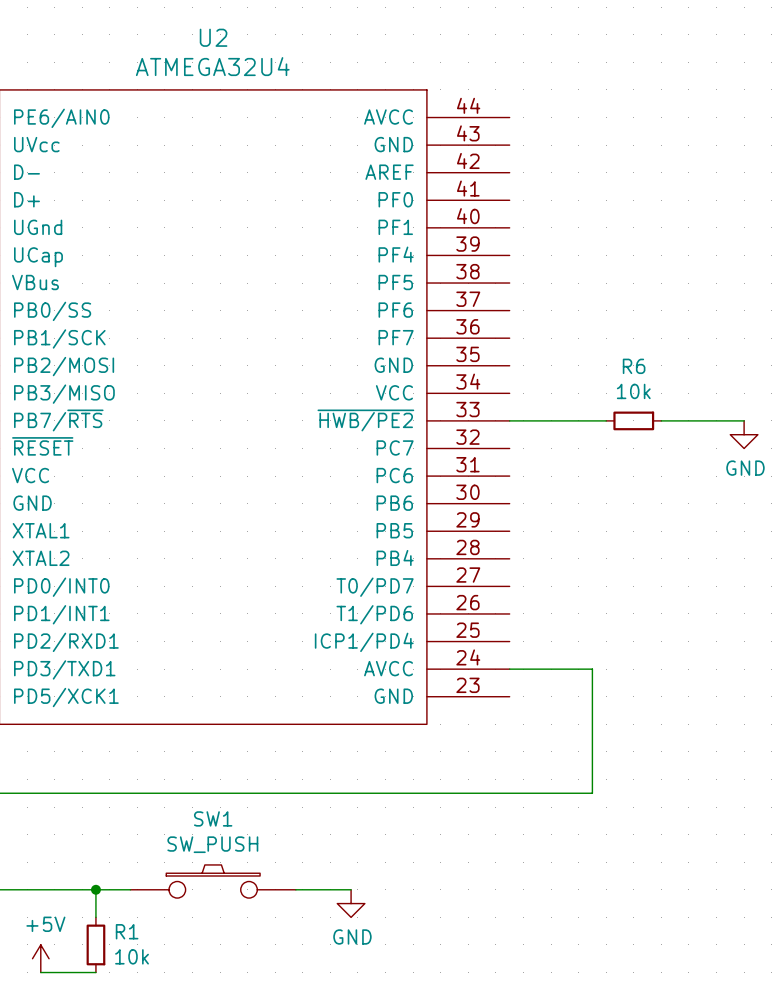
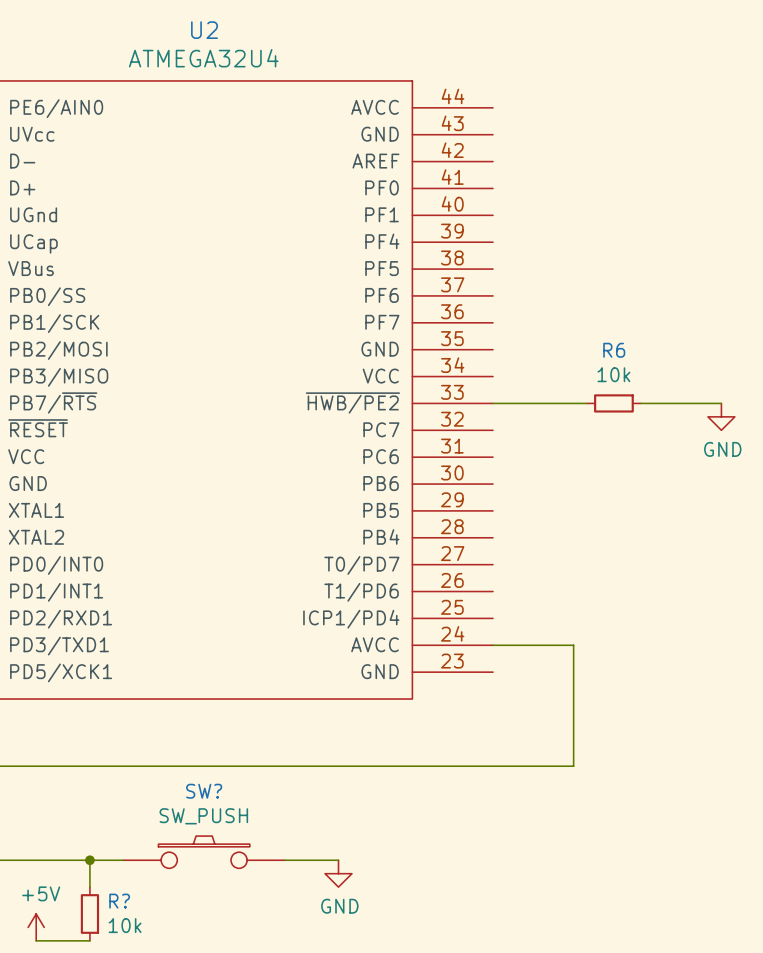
SW1 name: SW1 (213, 818) -> SW? (204, 791)
R1 name: R1 (127, 931) -> R? (119, 901)

